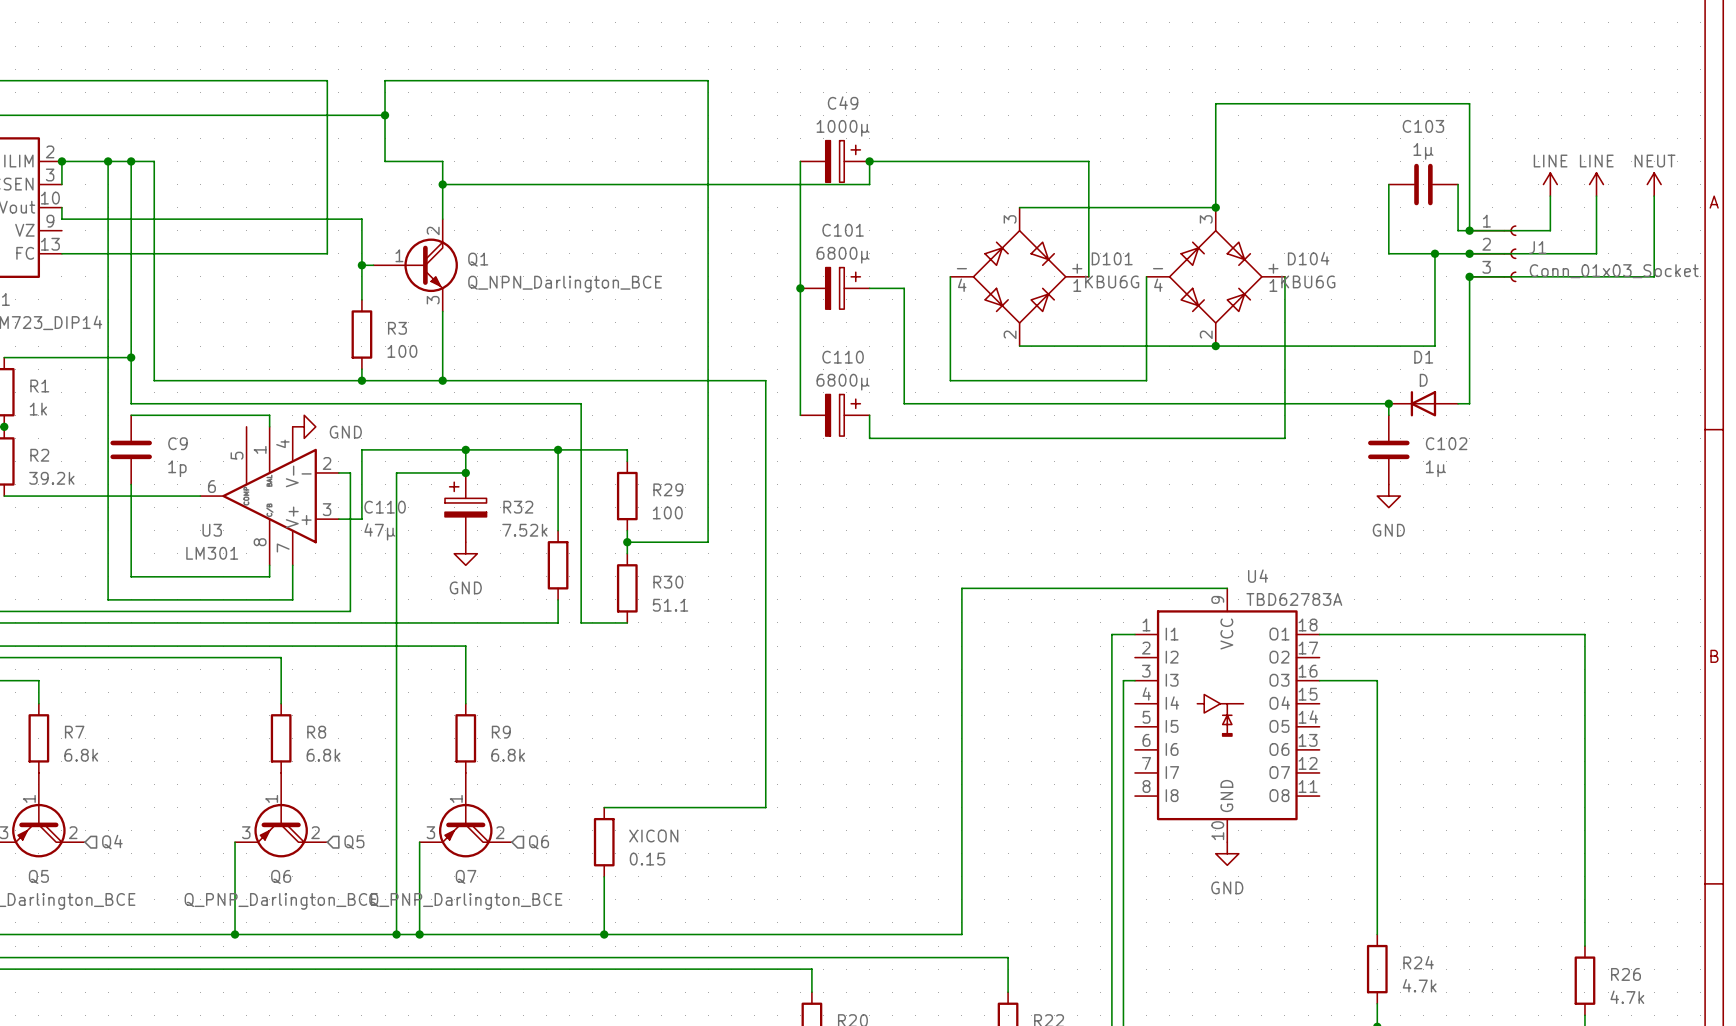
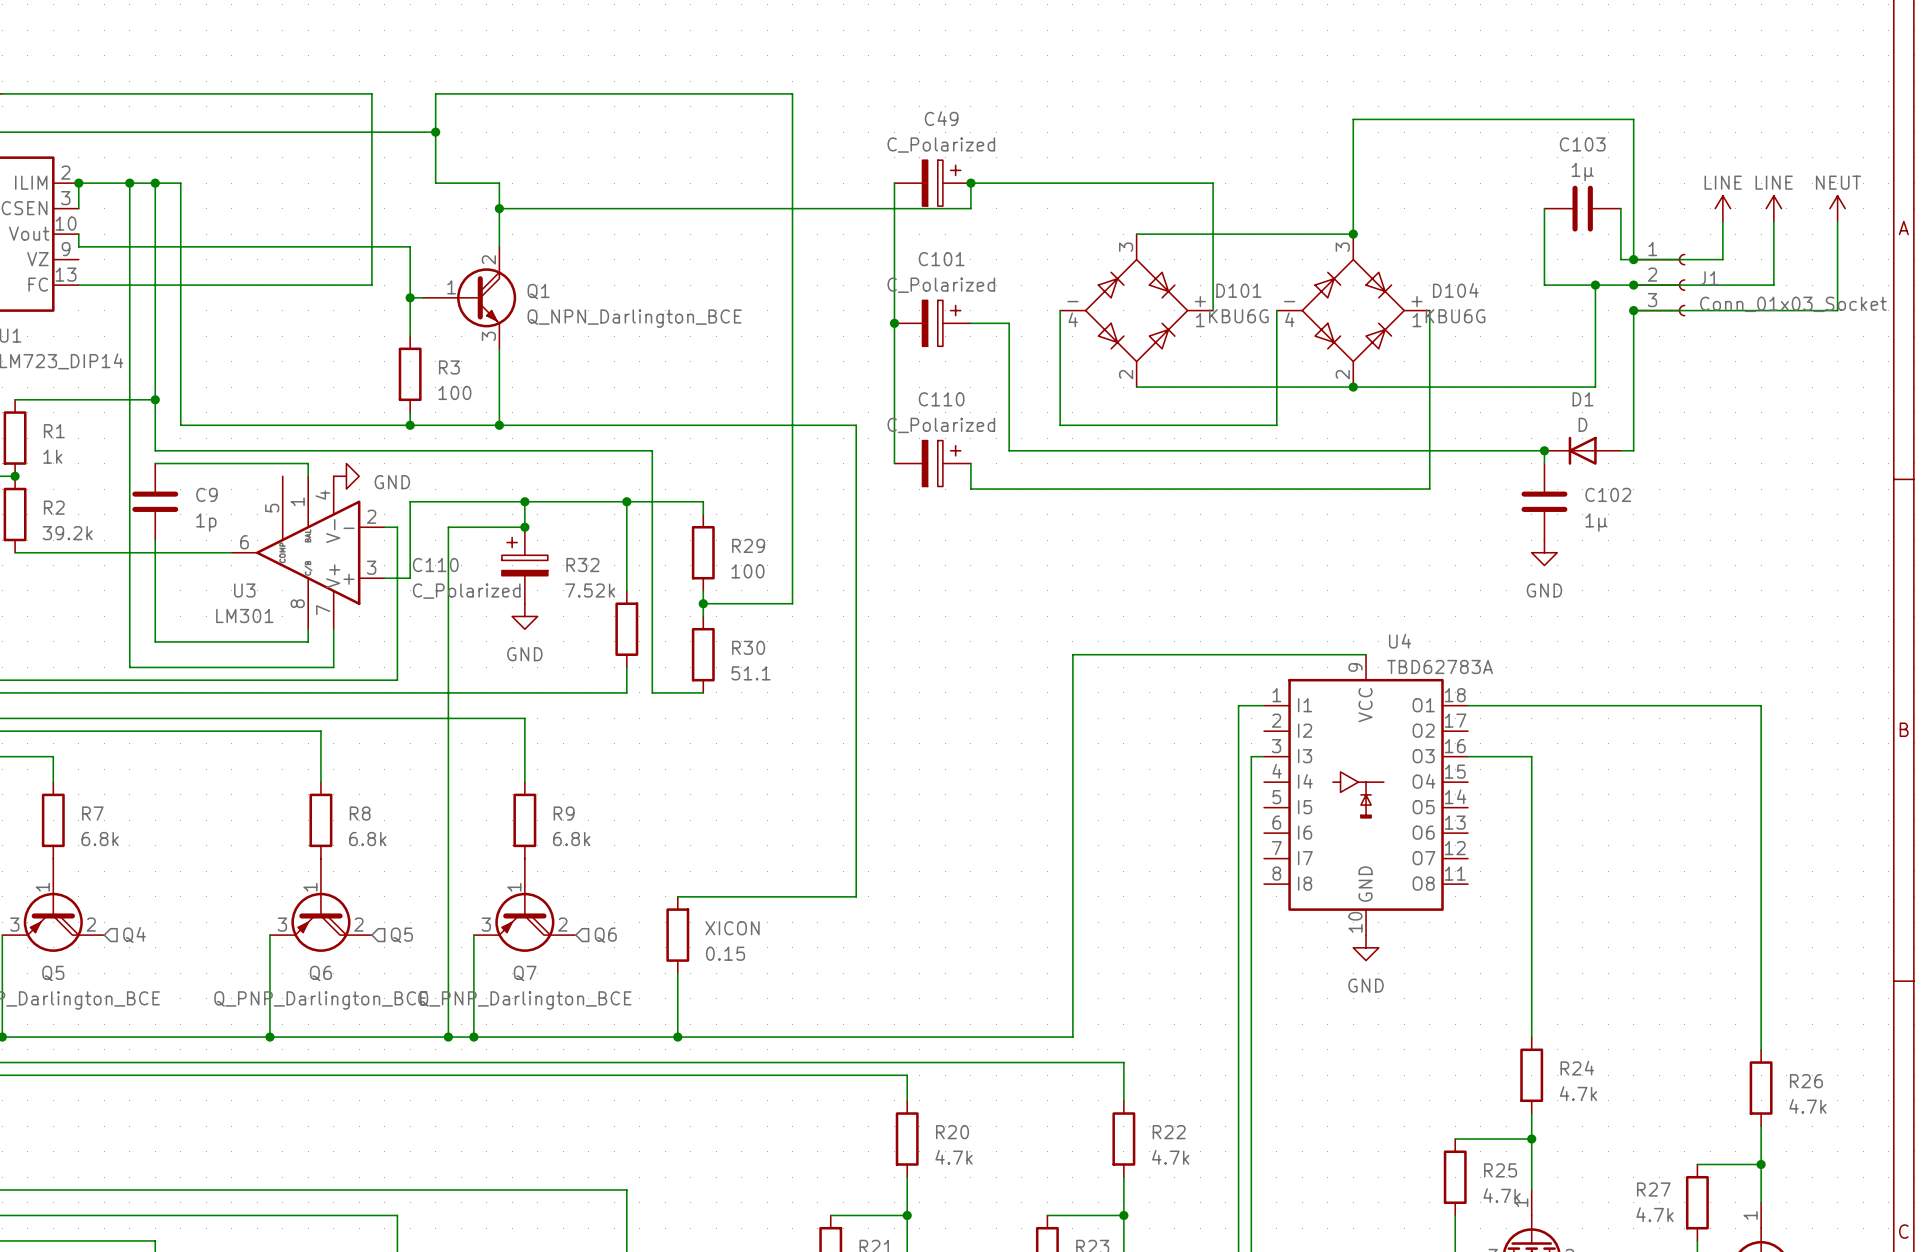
C49 value: 1000µ (843, 128) -> C_Polarized (941, 145)
C101 value: 6800µ (843, 255) -> C_Polarized (941, 285)
C110 value: 6800µ (843, 382) -> C_Polarized (941, 425)
C110 value: 47µ (379, 531) -> C_Polarized (466, 591)

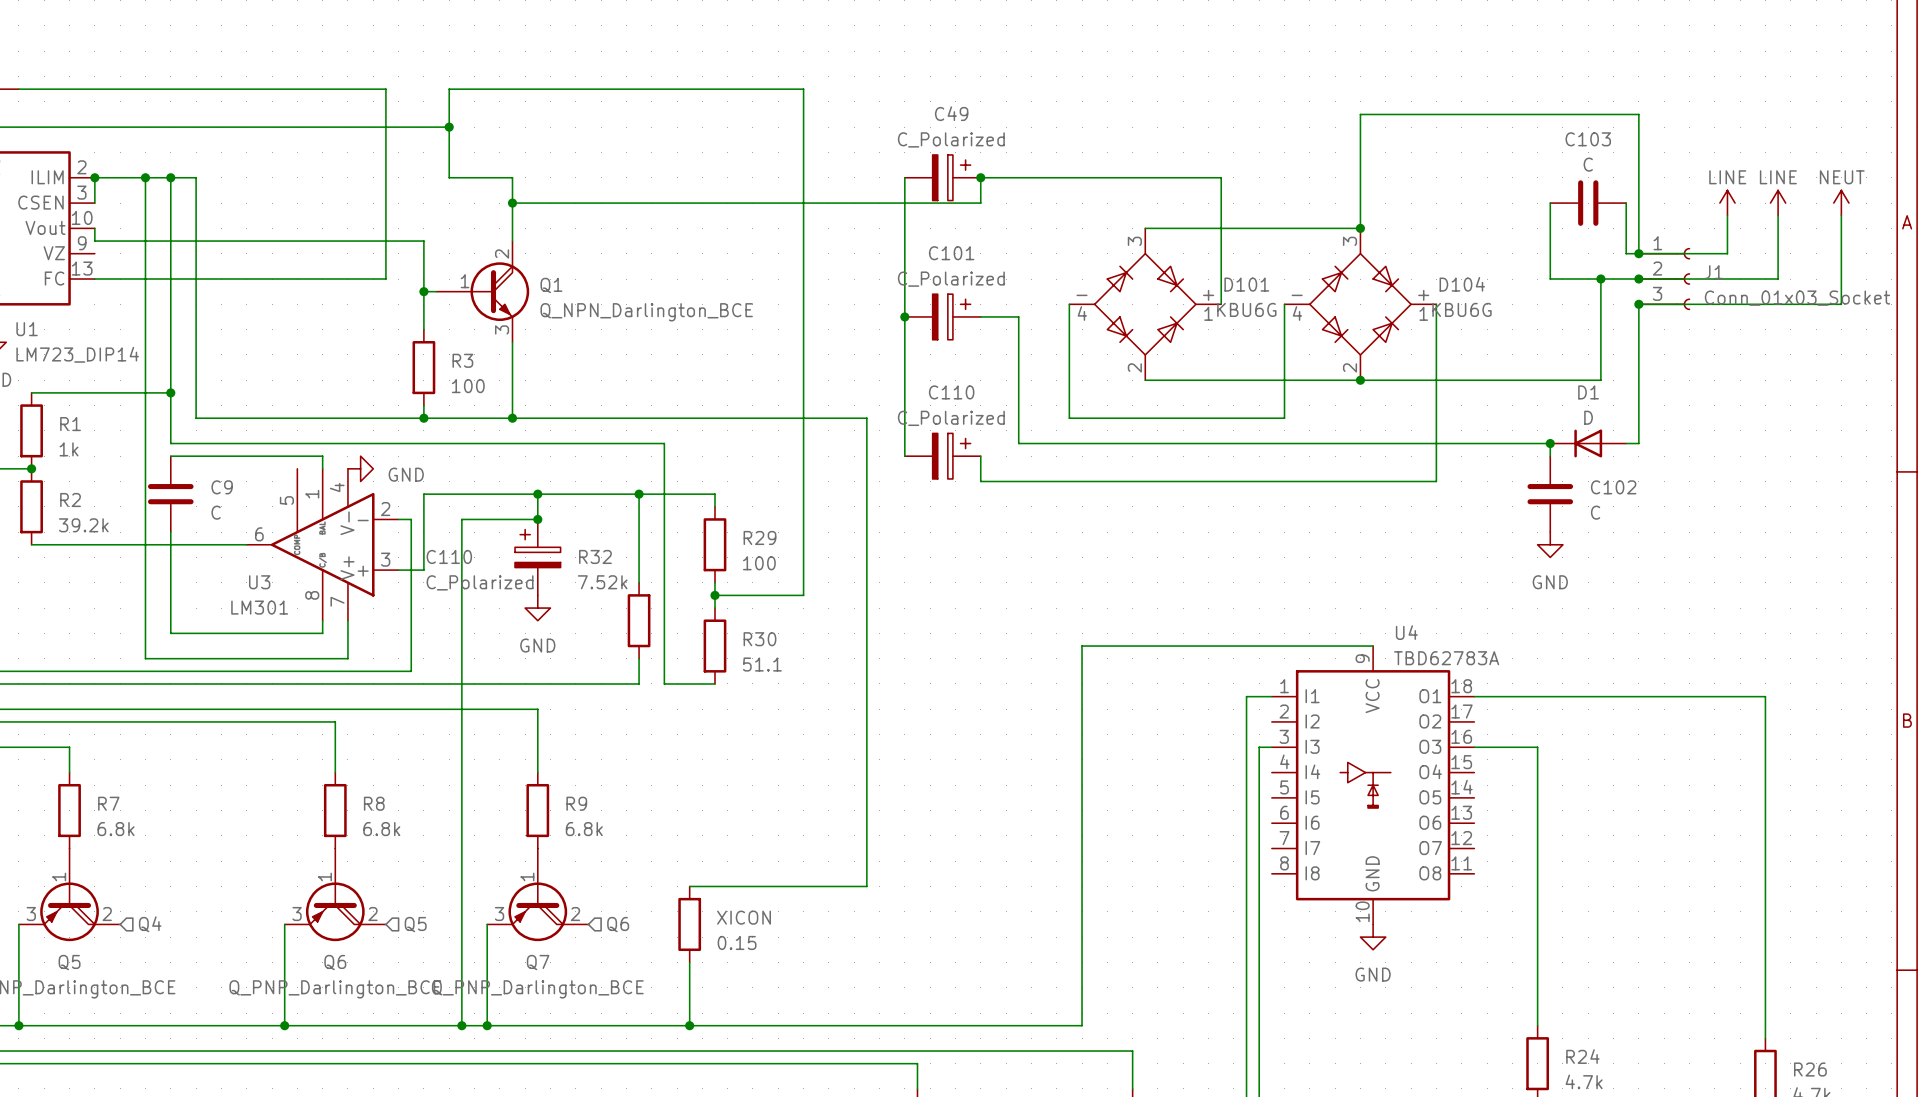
C103 value: 1µ (1582, 172) -> C (1588, 164)
C9 value: 1p (206, 522) -> C (216, 512)
C102 value: 1µ (1596, 522) -> C (1595, 512)

